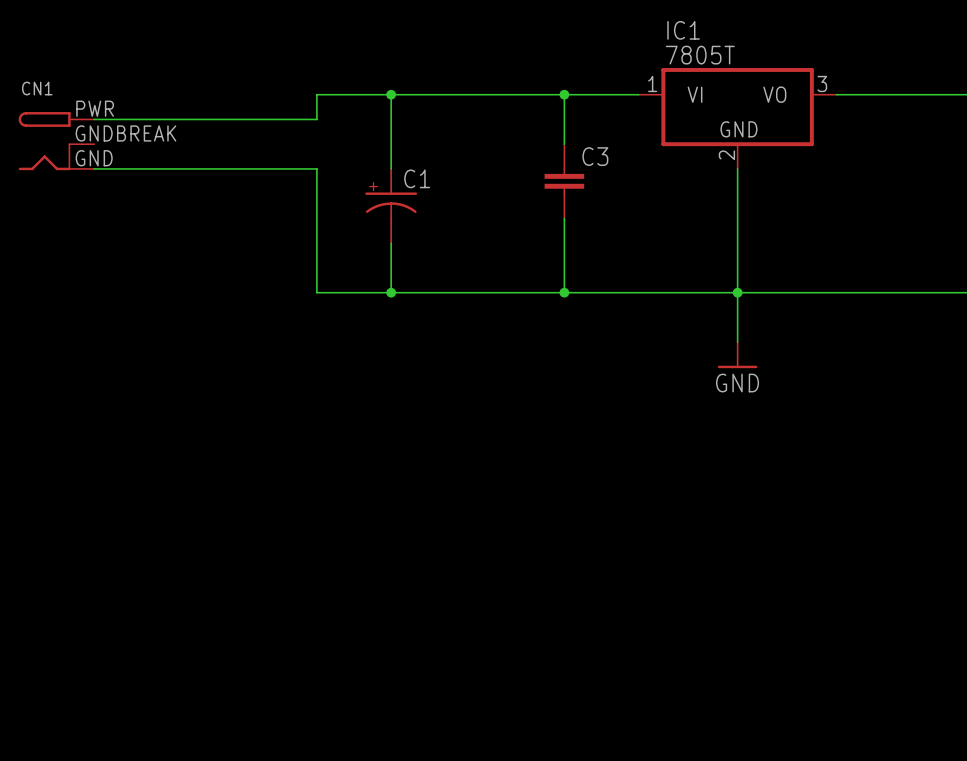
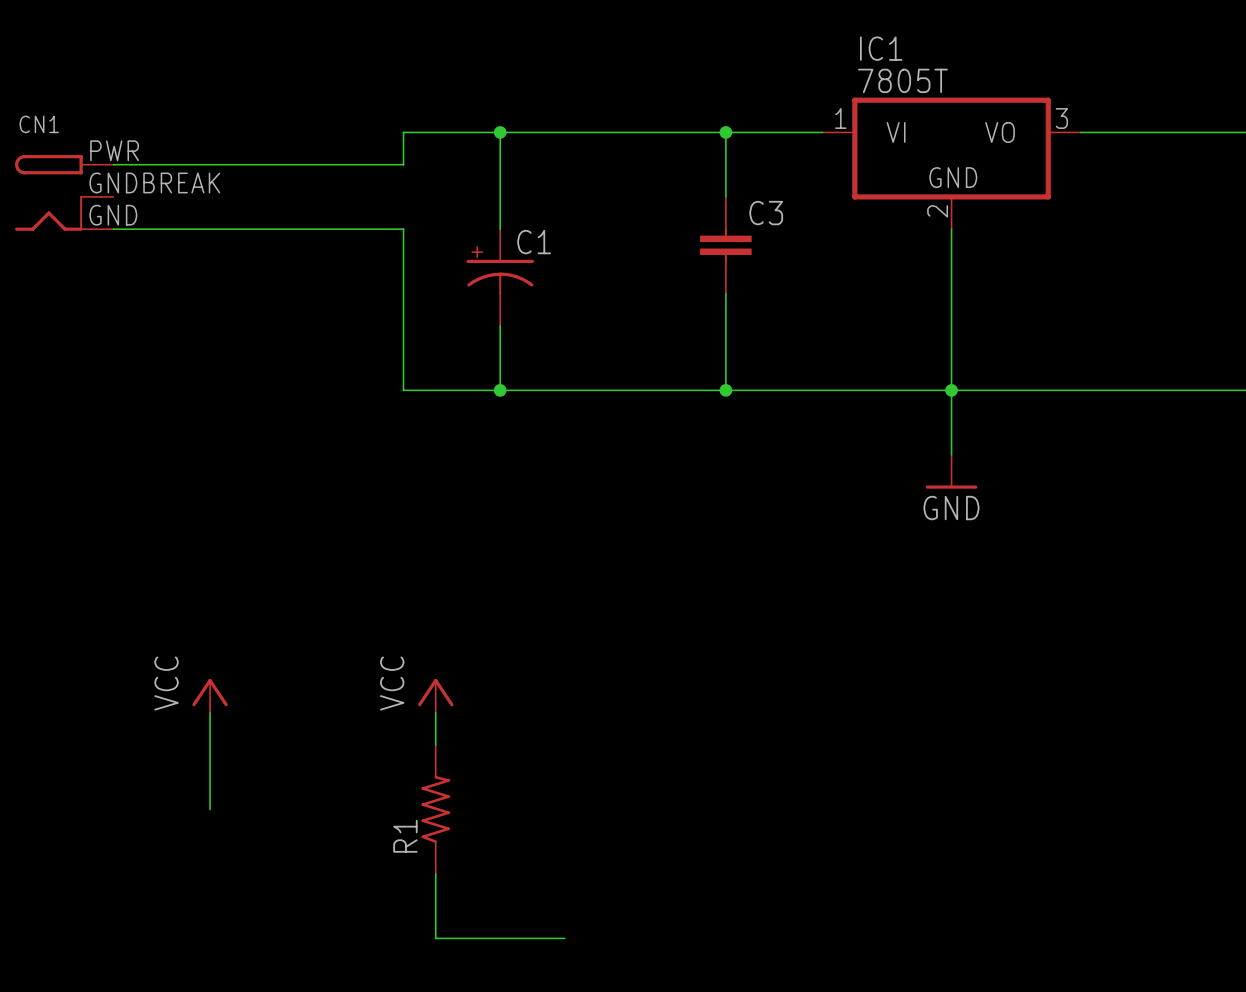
power symbol: none -> VCC (210, 695)
power symbol: none -> VCC (435, 695)
wire: none -> (210, 712) (210, 809)
wire: none -> (435, 712) (435, 744)
R1: none -> (435, 809)
wire: none -> (435, 873) (435, 938) (564, 938)

